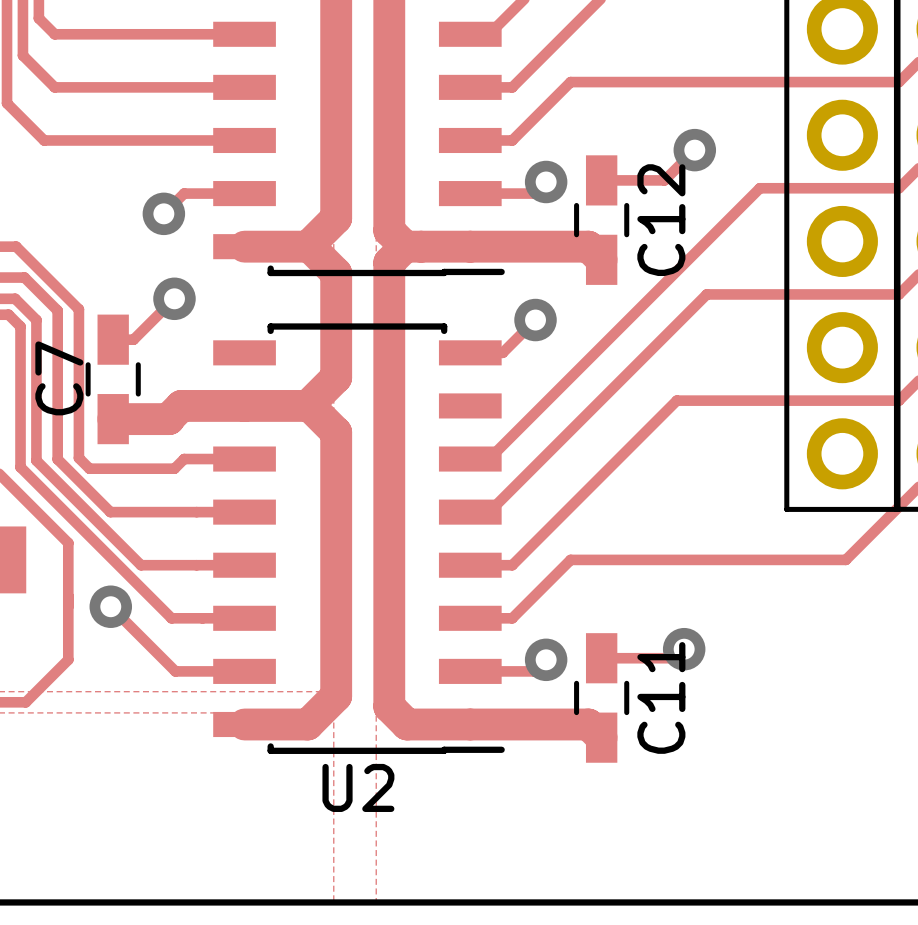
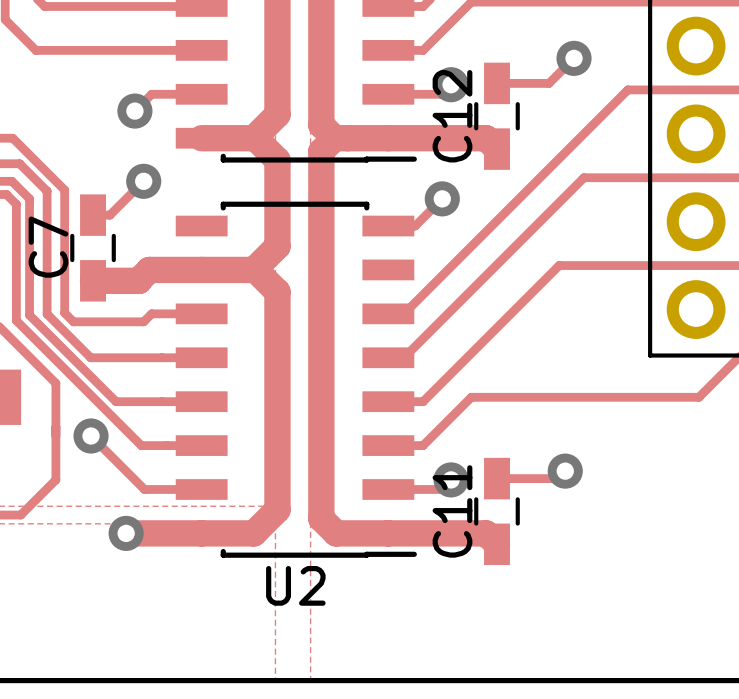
C12 name position: C12 (661, 220) -> C12 (452, 116)
C11 name position: C11 (661, 697) -> C11 (452, 511)
track: none -> (126, 533) (201, 533)
via: none -> (126, 533)

